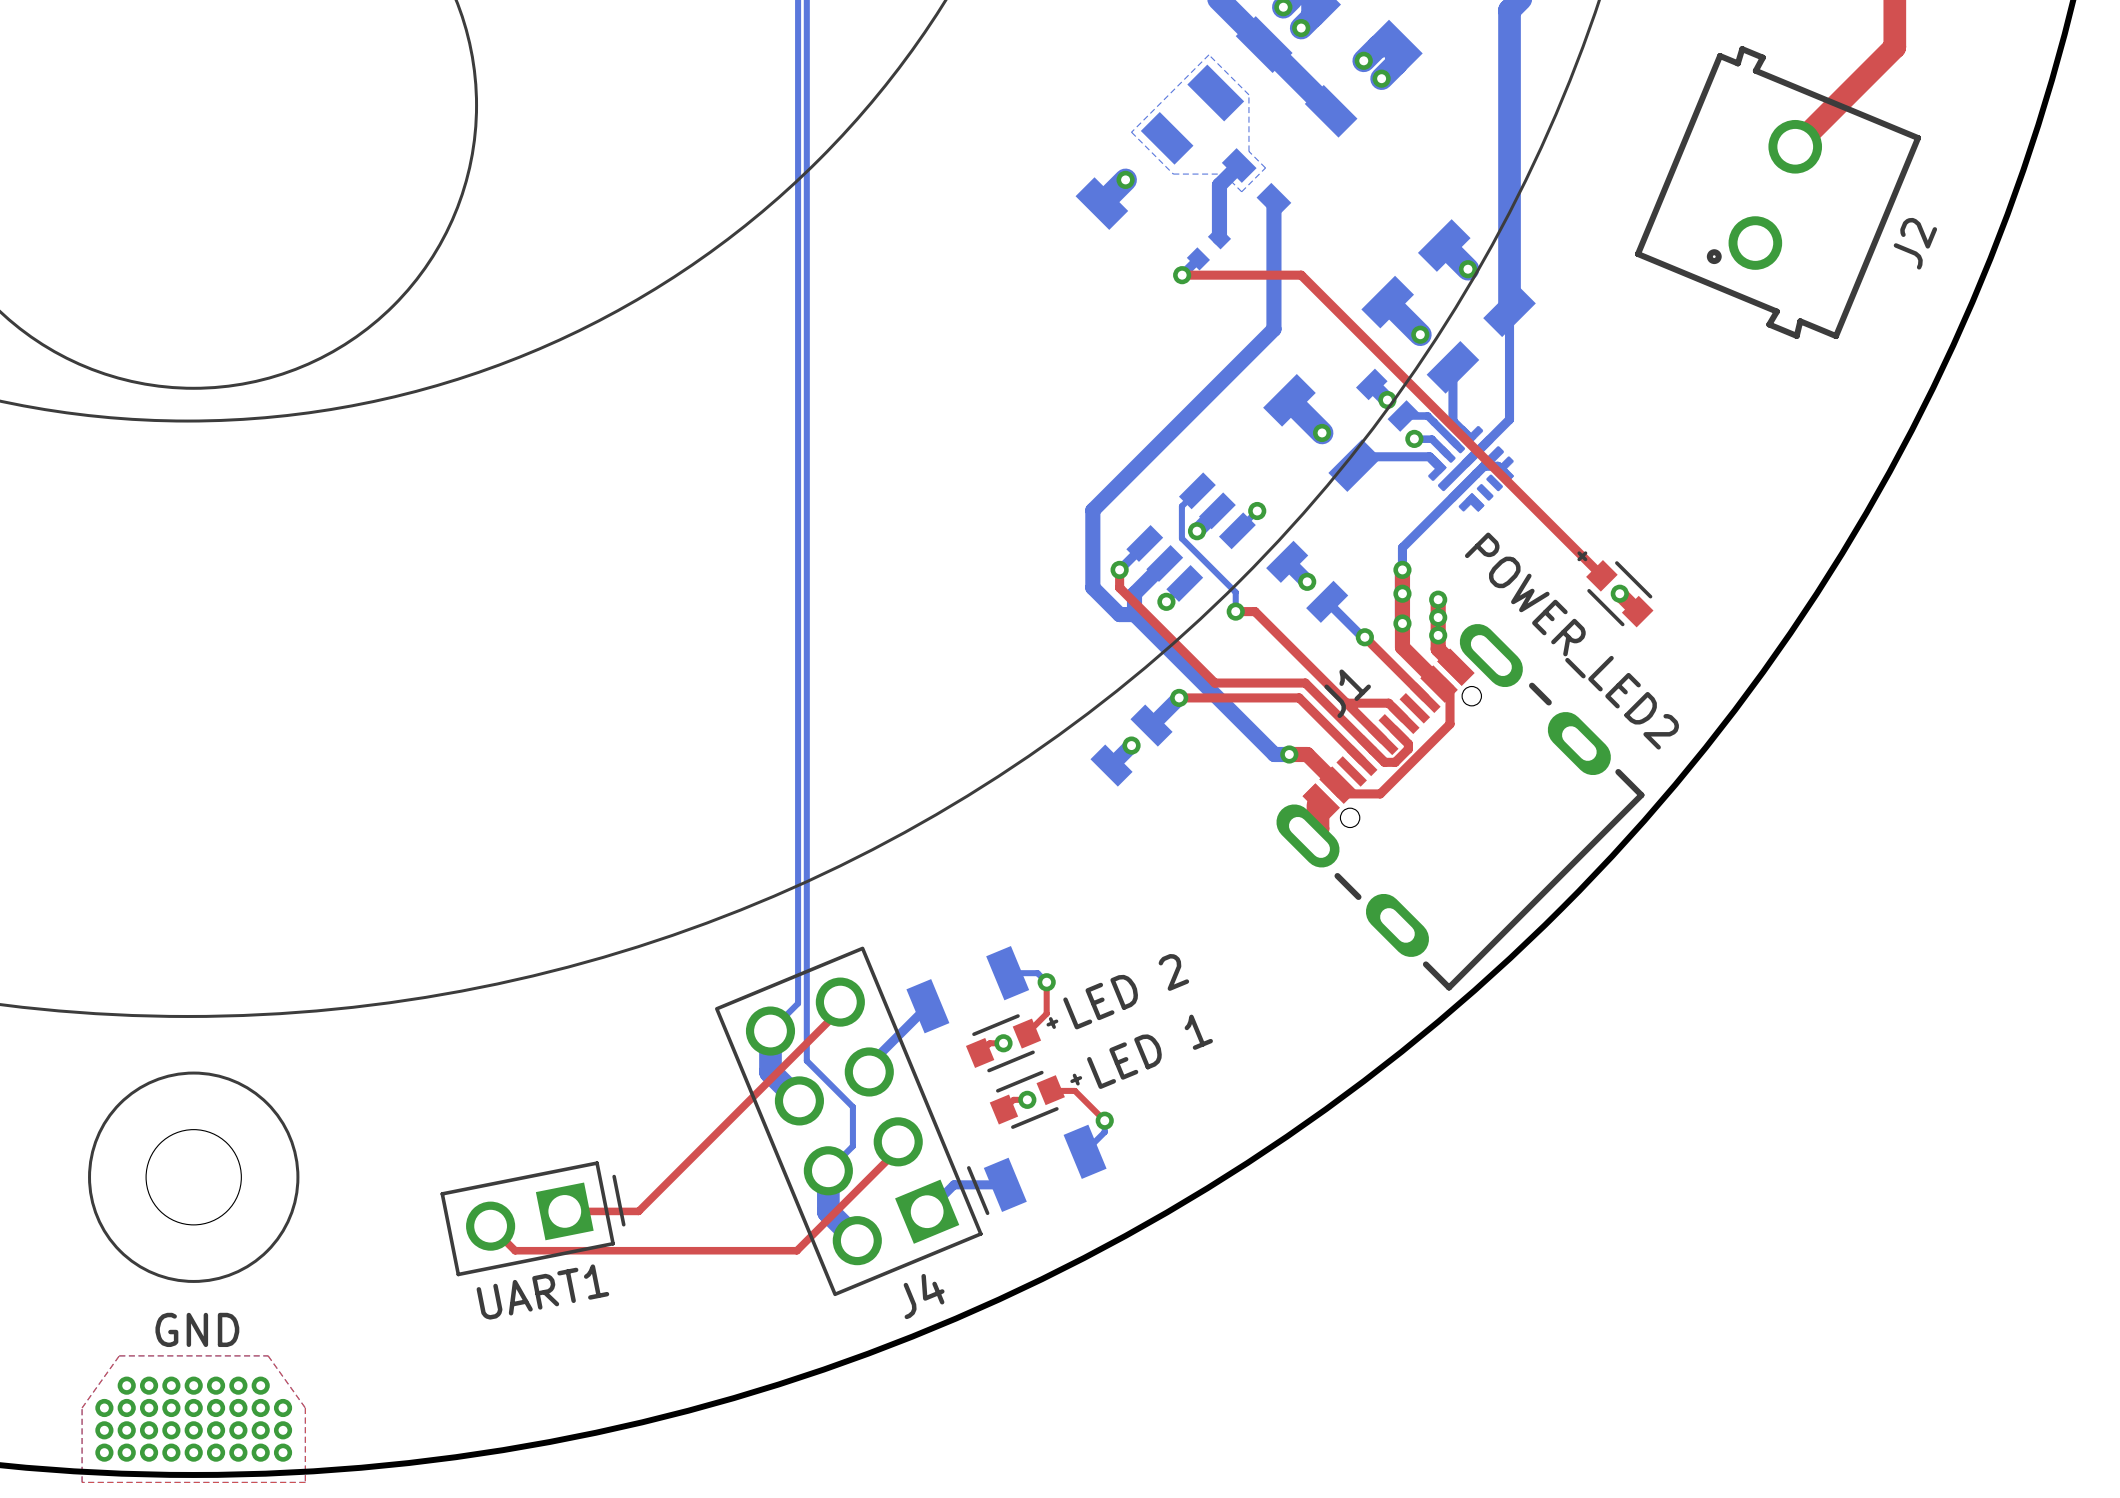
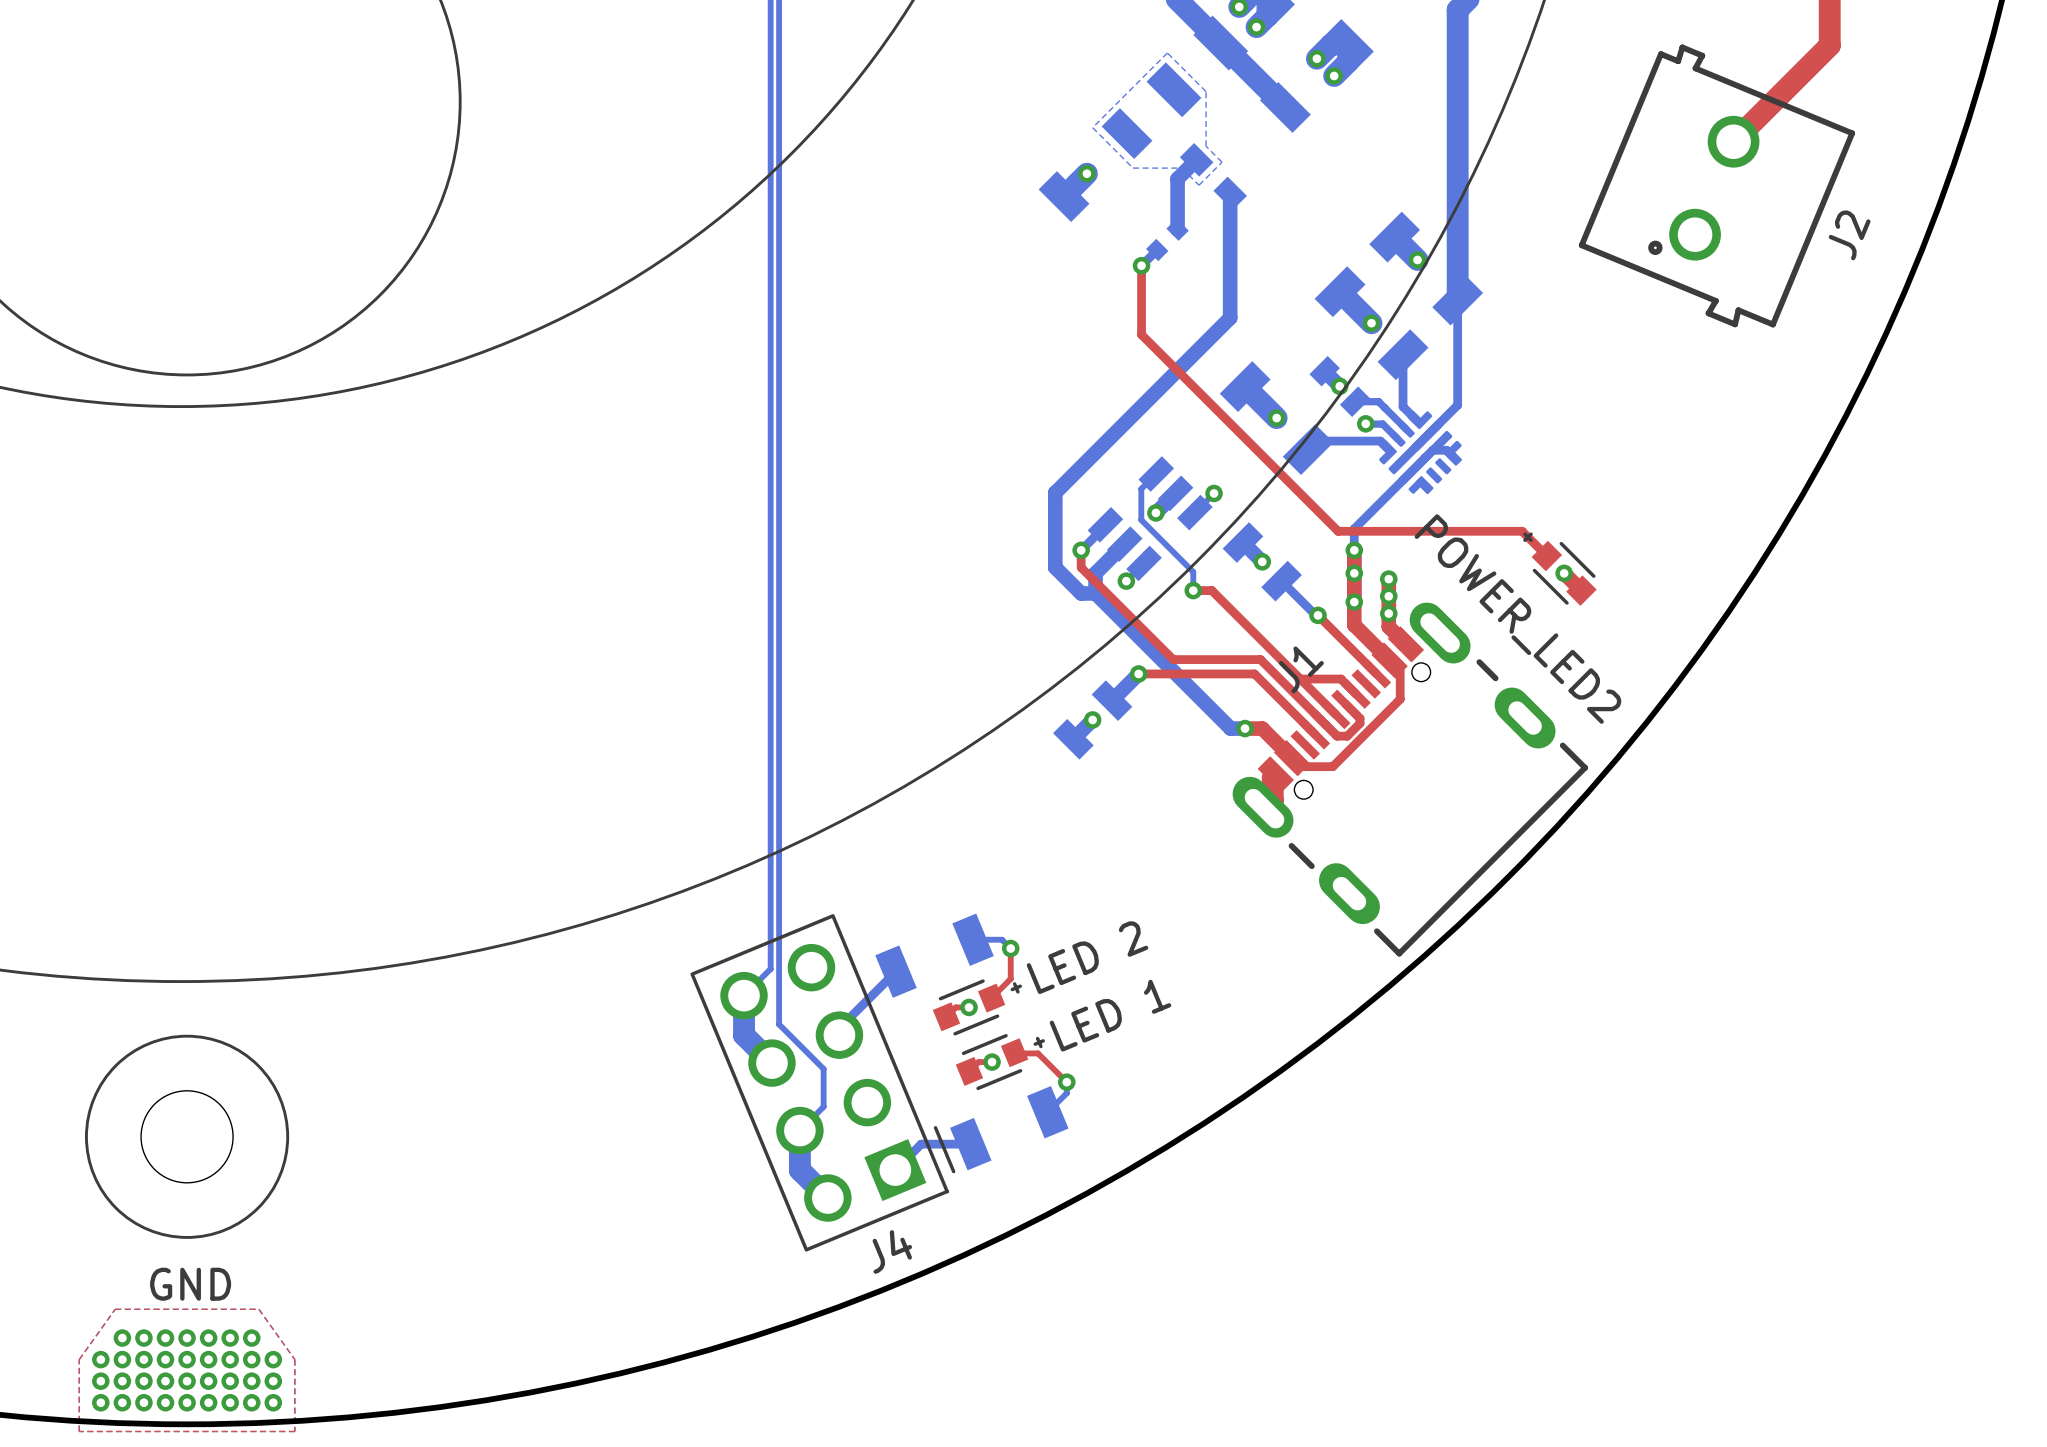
top track: (1182, 275) (1301, 275) (1576, 550) -> (1141, 265) (1141, 334) (1338, 531) (1522, 531)
top track: (840, 1002) (840, 1009) (638, 1211) (564, 1211) -> none
top track: (898, 1141) (898, 1149) (796, 1250) (515, 1250) (490, 1226) -> none
UART1: (533, 1218) -> none

